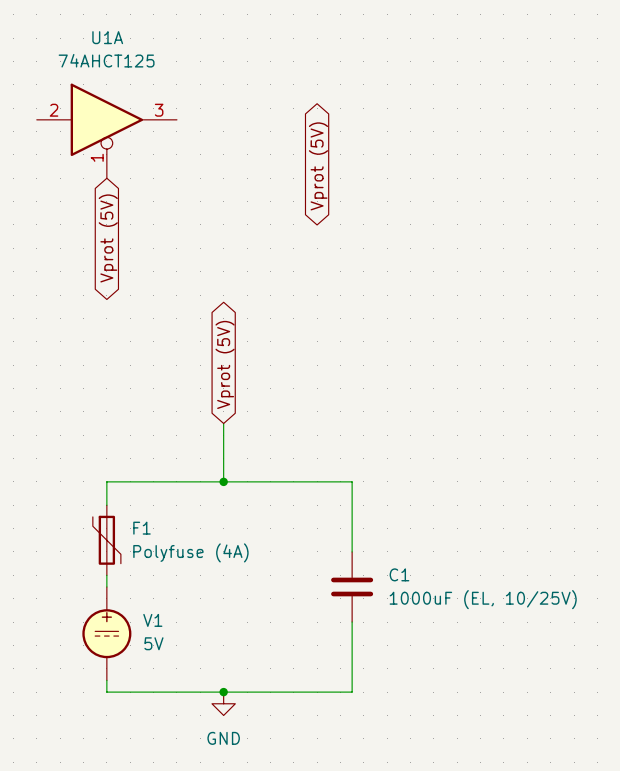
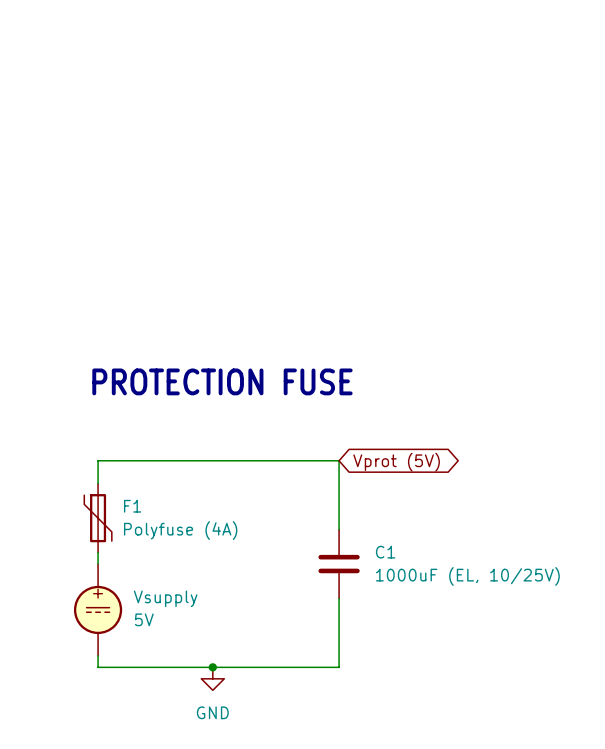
U1A: 74AHCT125 (106, 130) -> none
global label: Vprot (5V) (318, 166) -> none
global label: Vprot (5V) (108, 238) -> none
global label: Vprot (5V) (225, 364) -> none
text: none -> PROTECTION FUSE (222, 381)
wire: (223, 423) (223, 481) -> none
junction: (223, 481) -> none
global label: none -> Vprot (5V) (396, 462)
V1 name: V1 (152, 620) -> Vsupply (165, 598)

